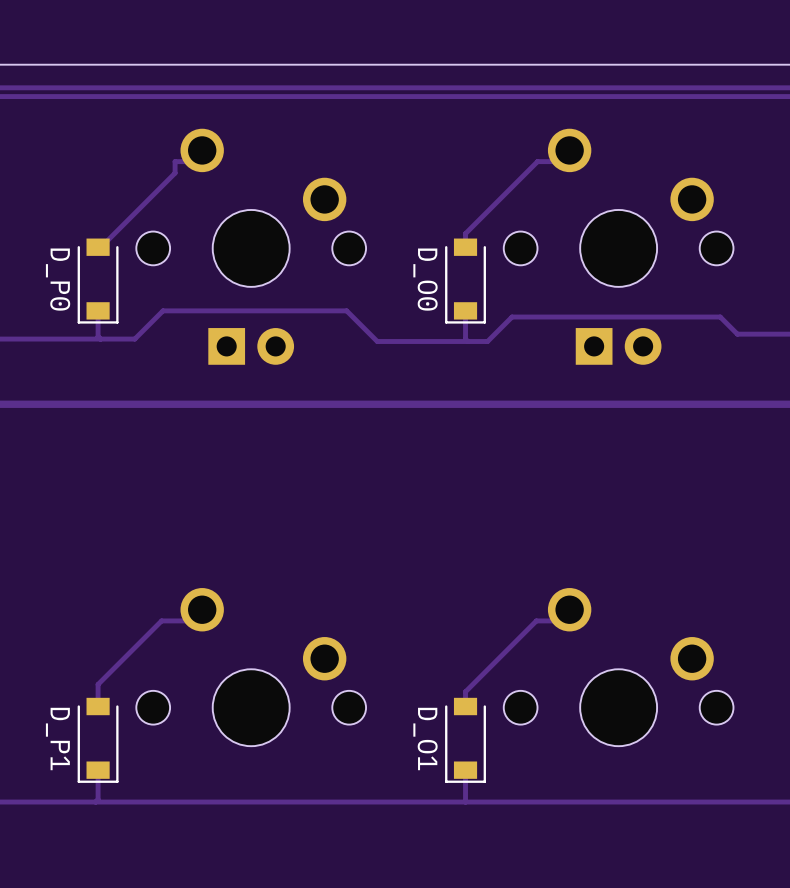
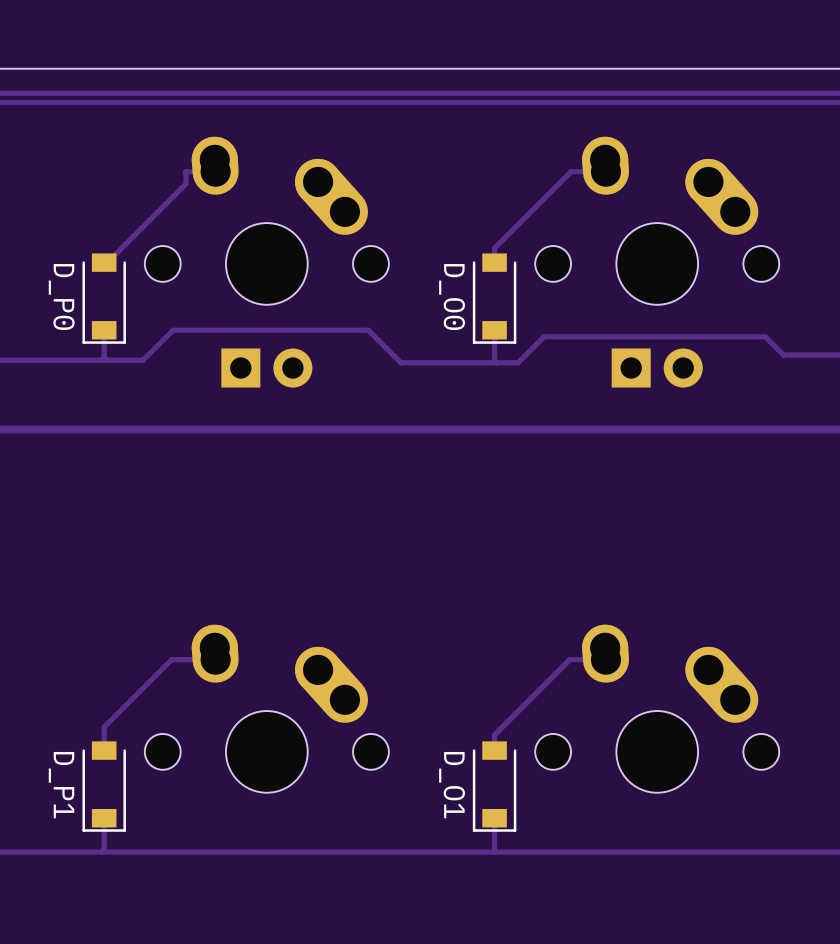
part footprint: [136, 128, 367, 365] -> [144, 136, 389, 388]
part footprint: [503, 128, 734, 365] -> [535, 136, 780, 388]
part footprint: [136, 588, 367, 747] -> [144, 624, 389, 793]
part footprint: [503, 588, 734, 747] -> [535, 624, 780, 793]

